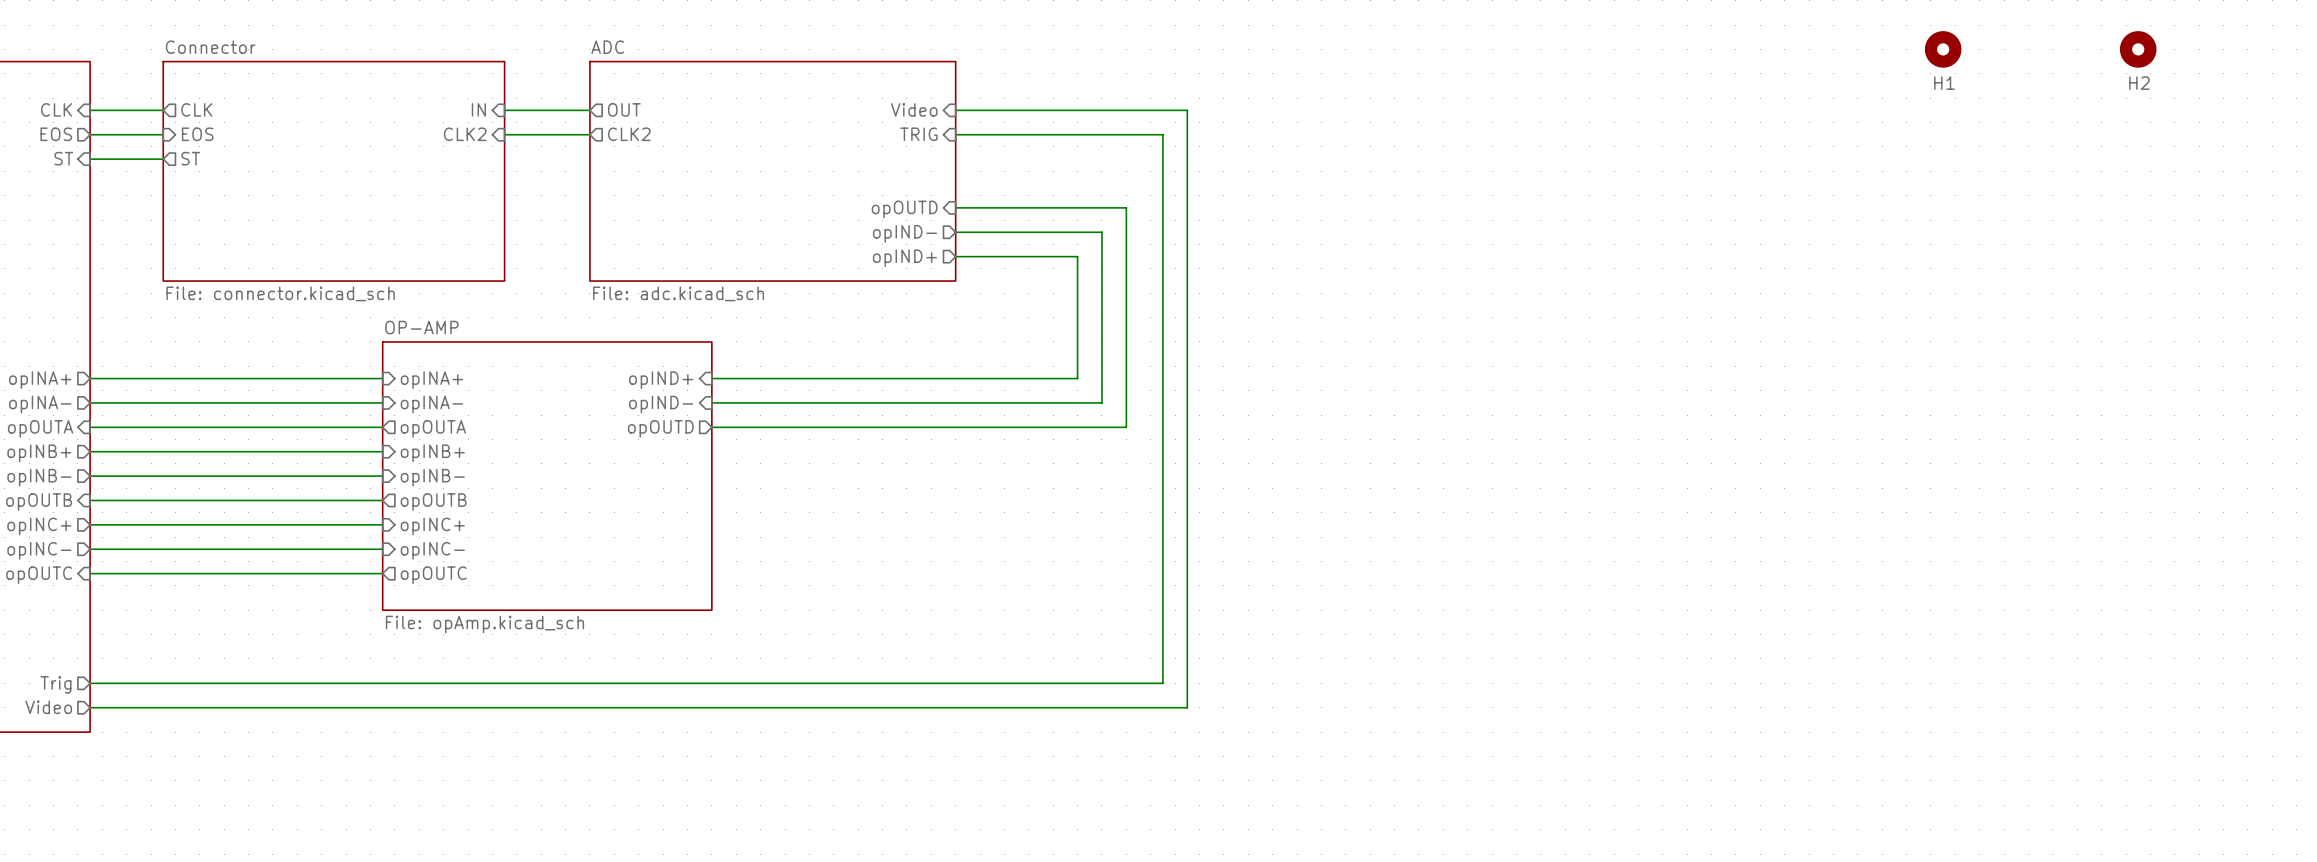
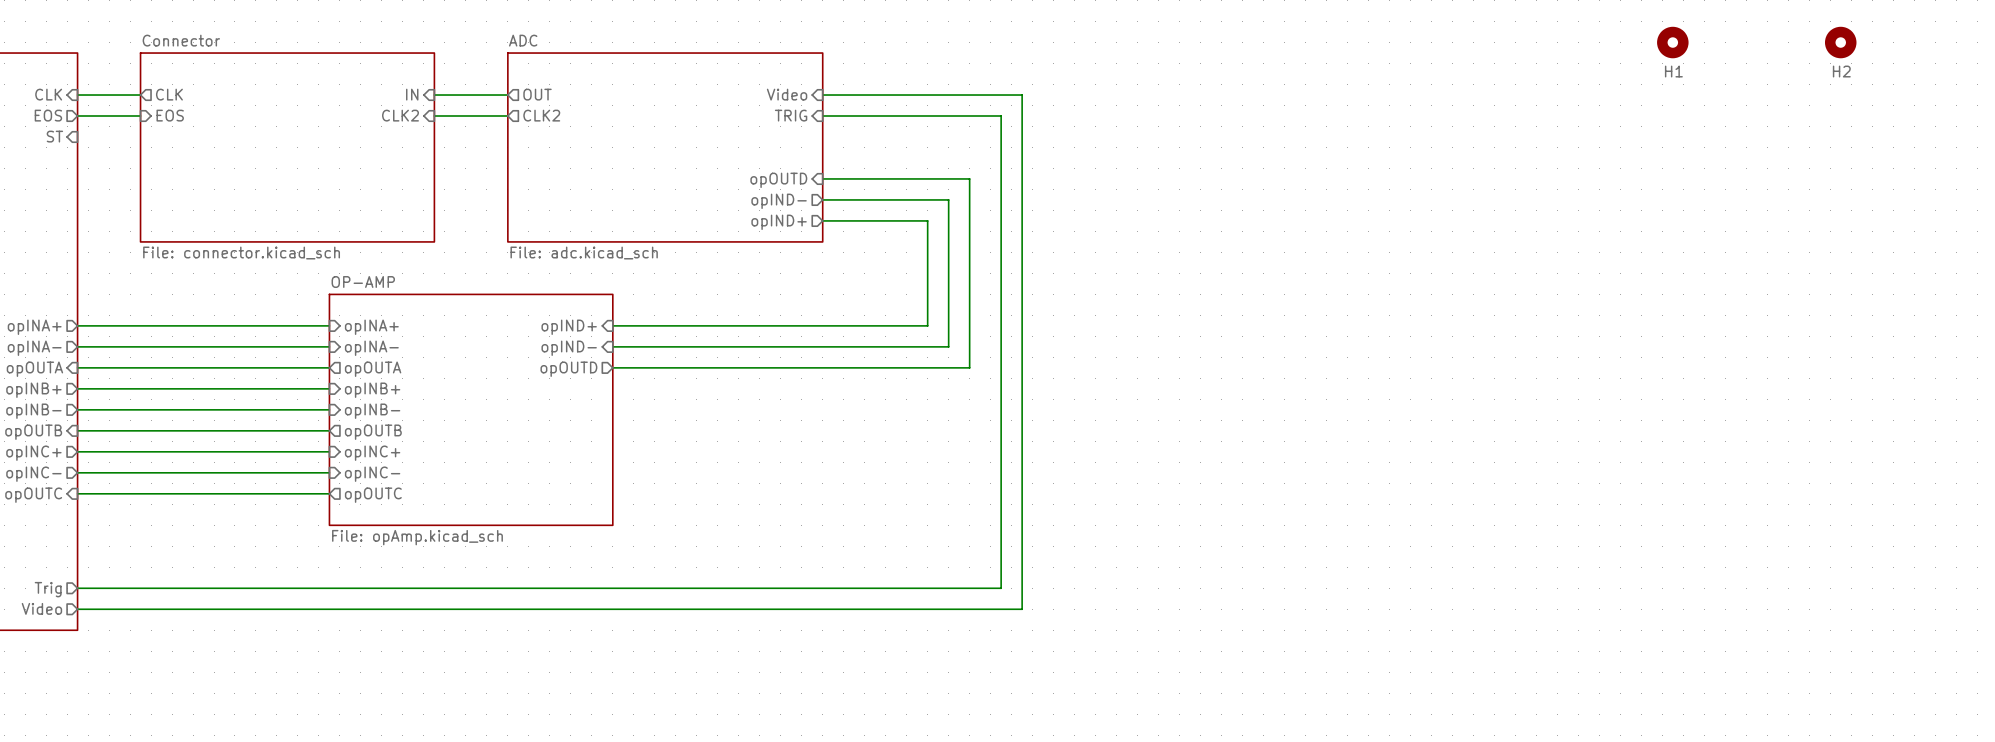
sheet pin: ST (190, 158) -> none
wire: (90, 159) (163, 159) -> none

